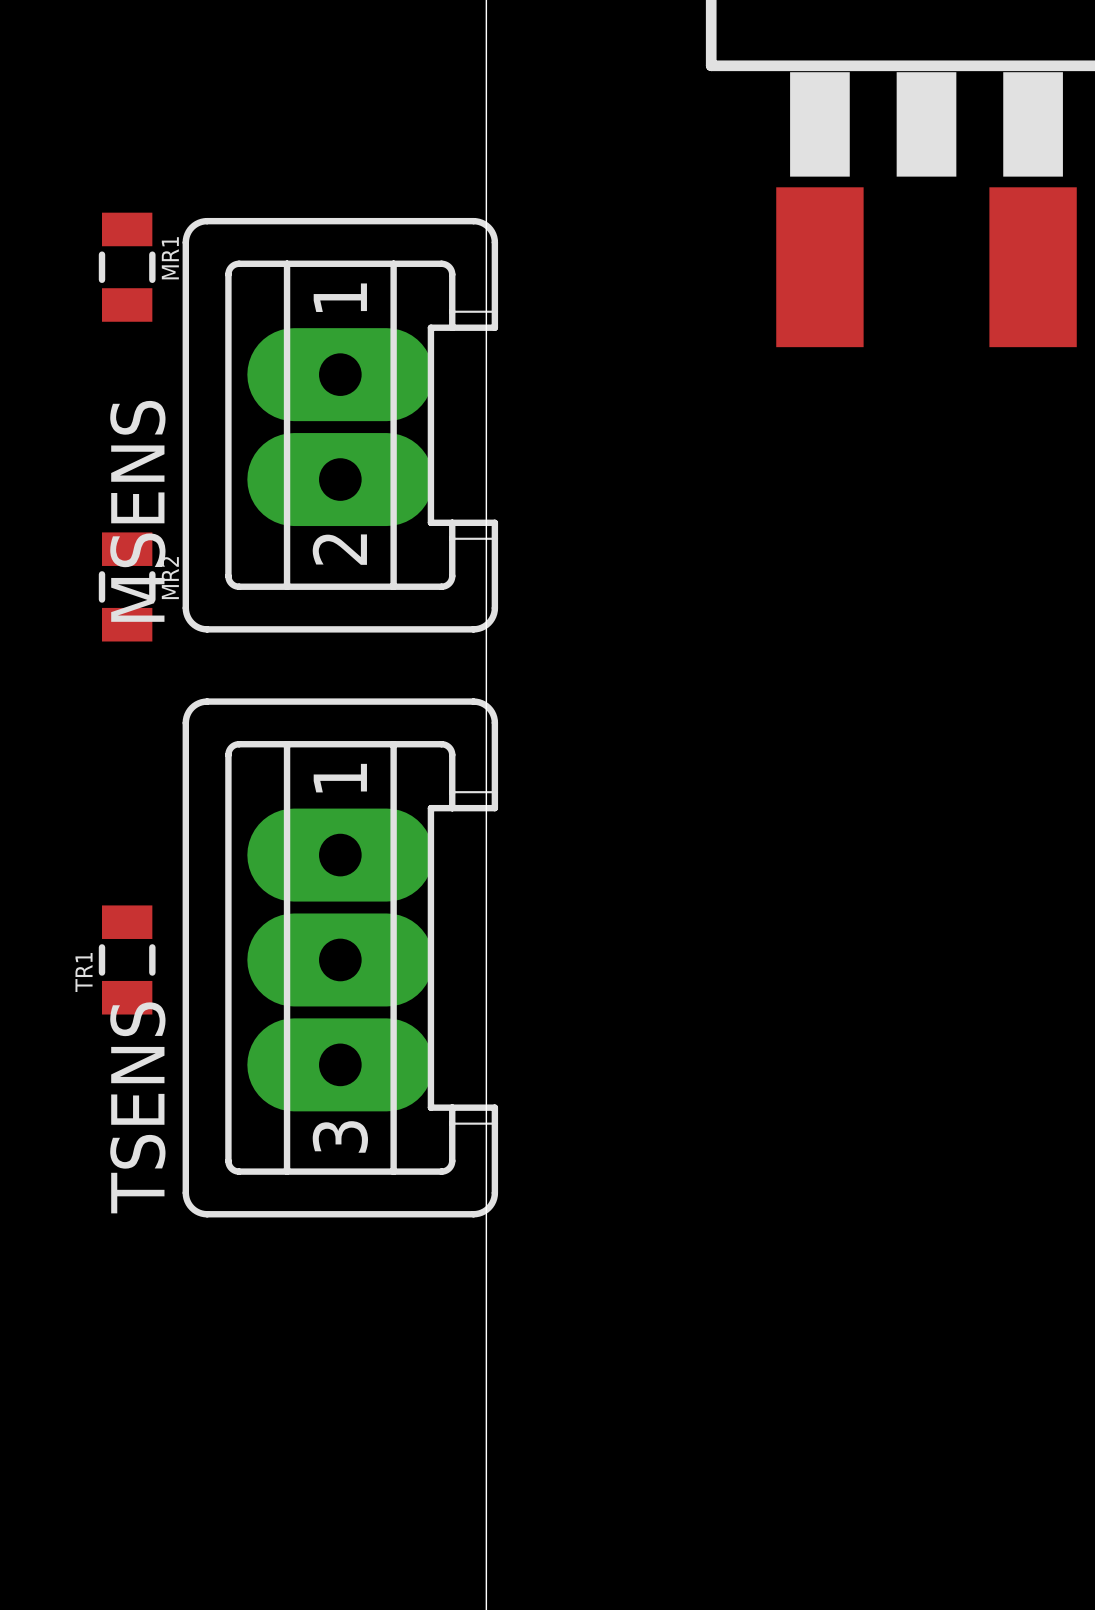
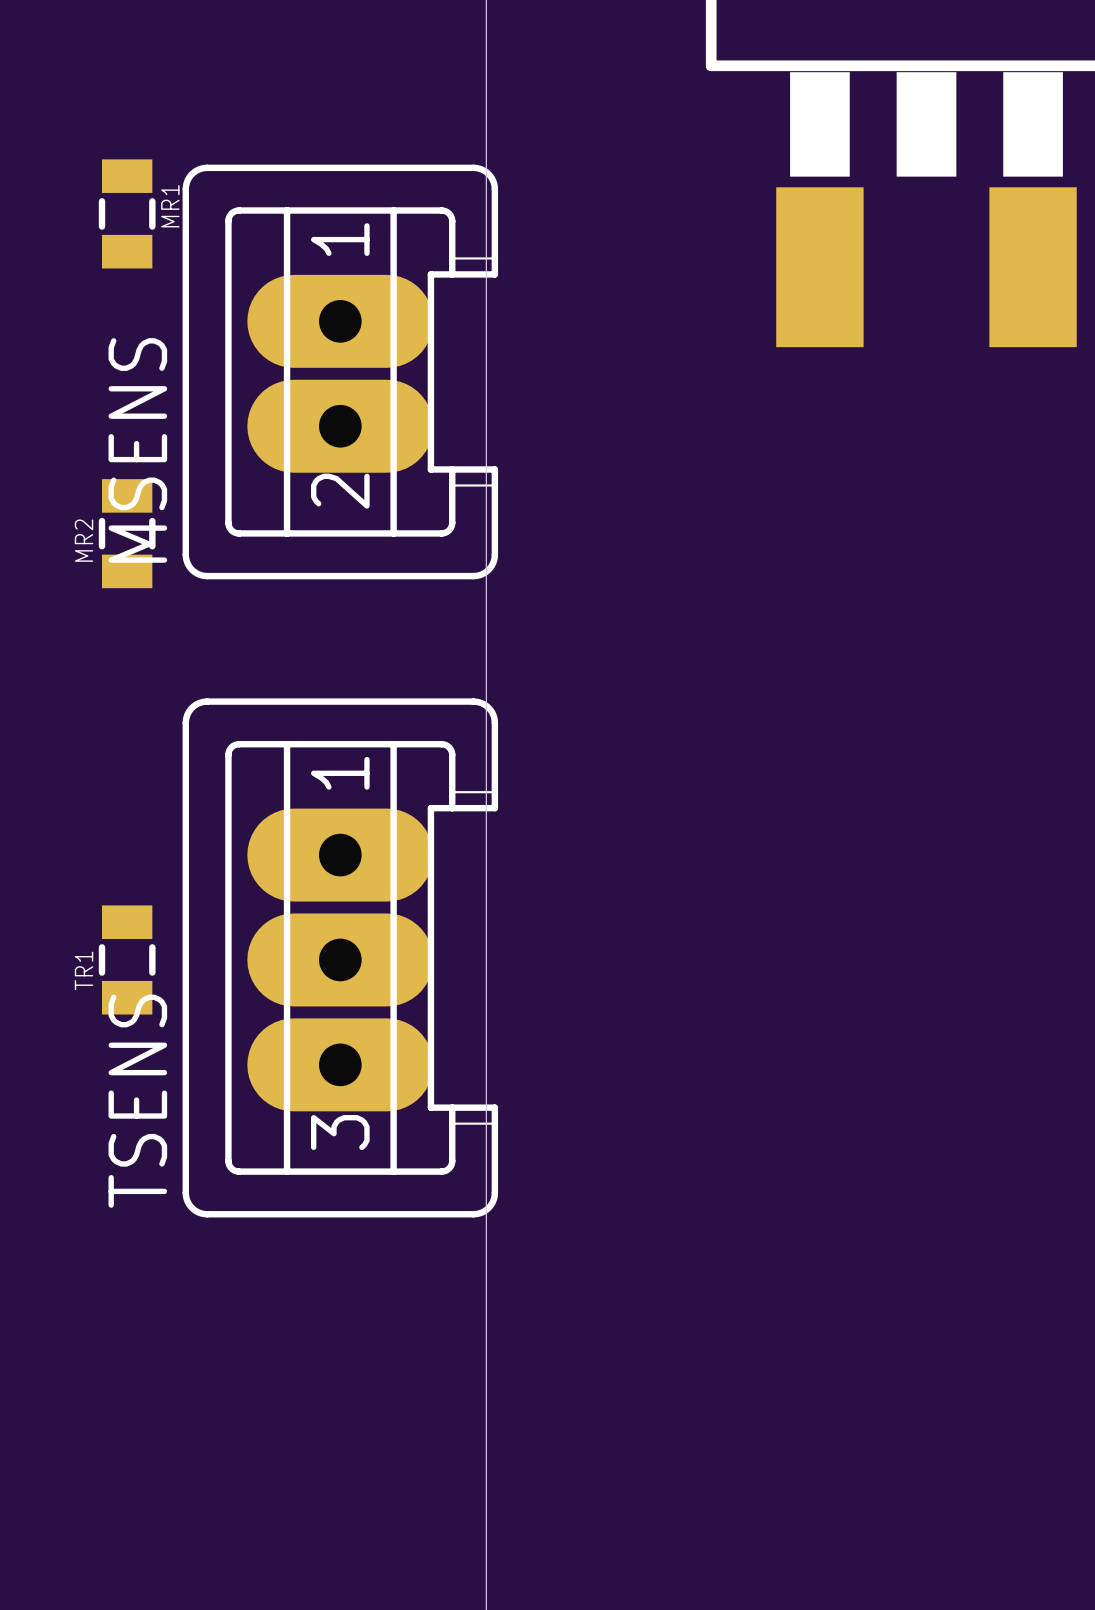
MR1 position: (127, 267) -> (127, 213)
MSENS position: (340, 425) -> (340, 371)
MR2 name position: MR2 (170, 578) -> MR2 (84, 540)
MR2 position: (127, 586) -> (127, 533)

